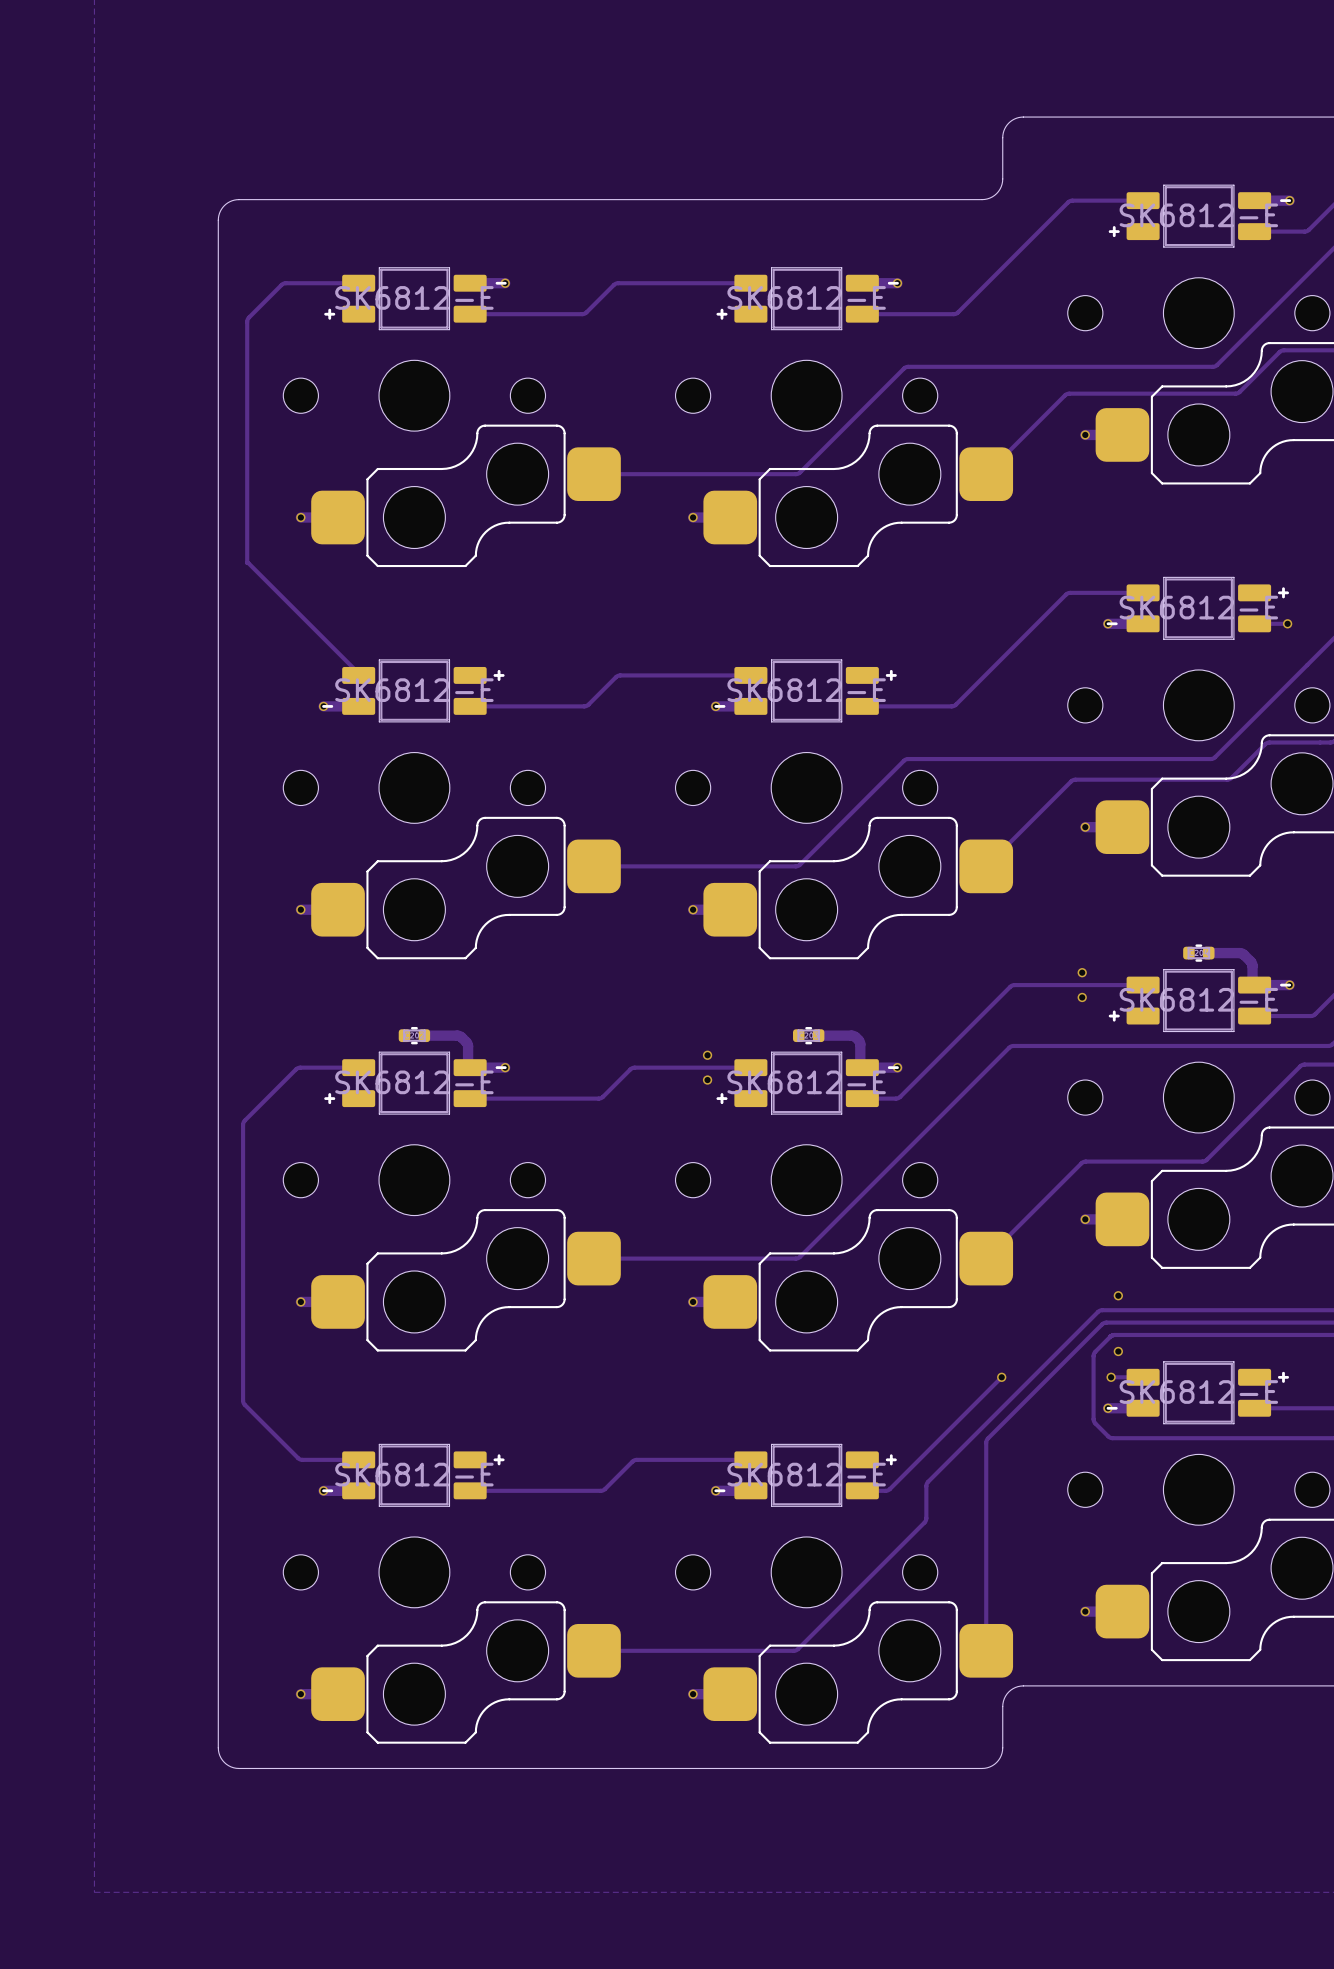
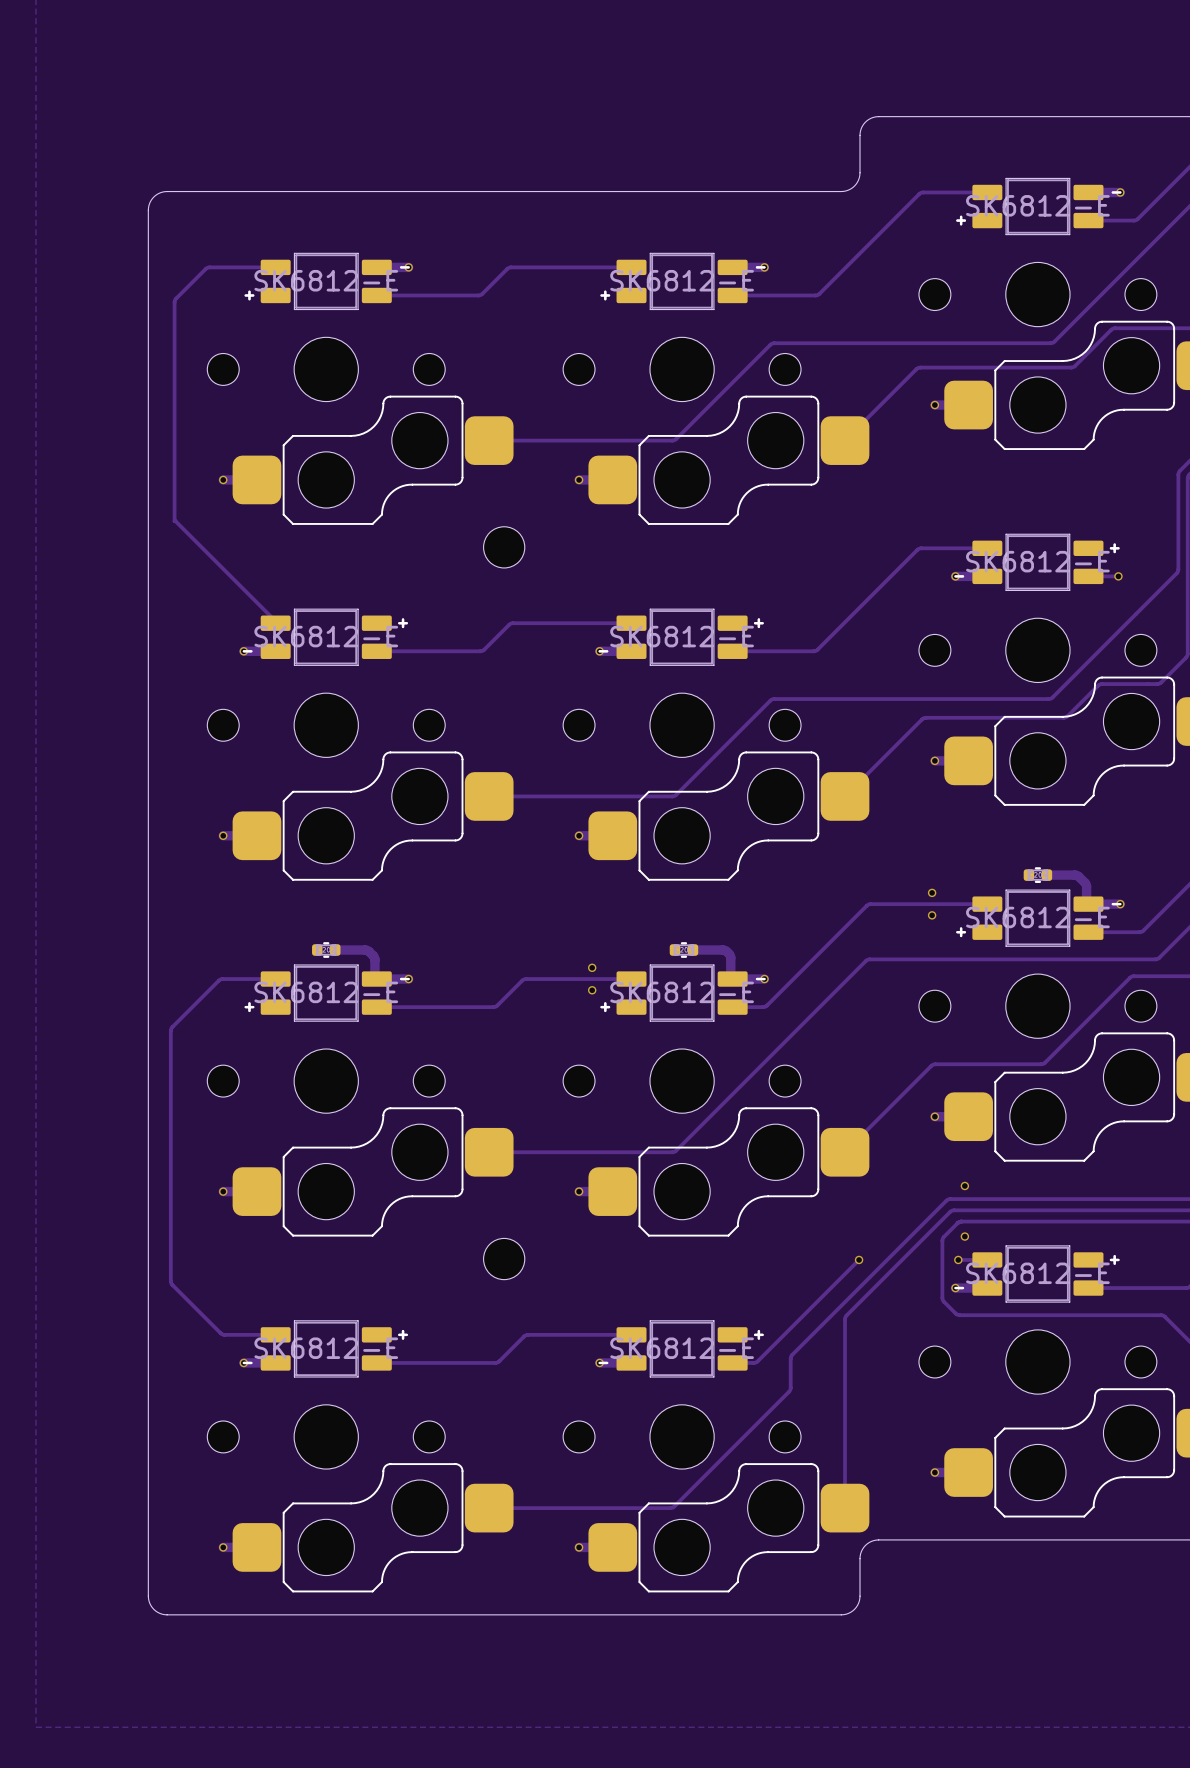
part: none -> (504, 547)
part: none -> (504, 1259)

